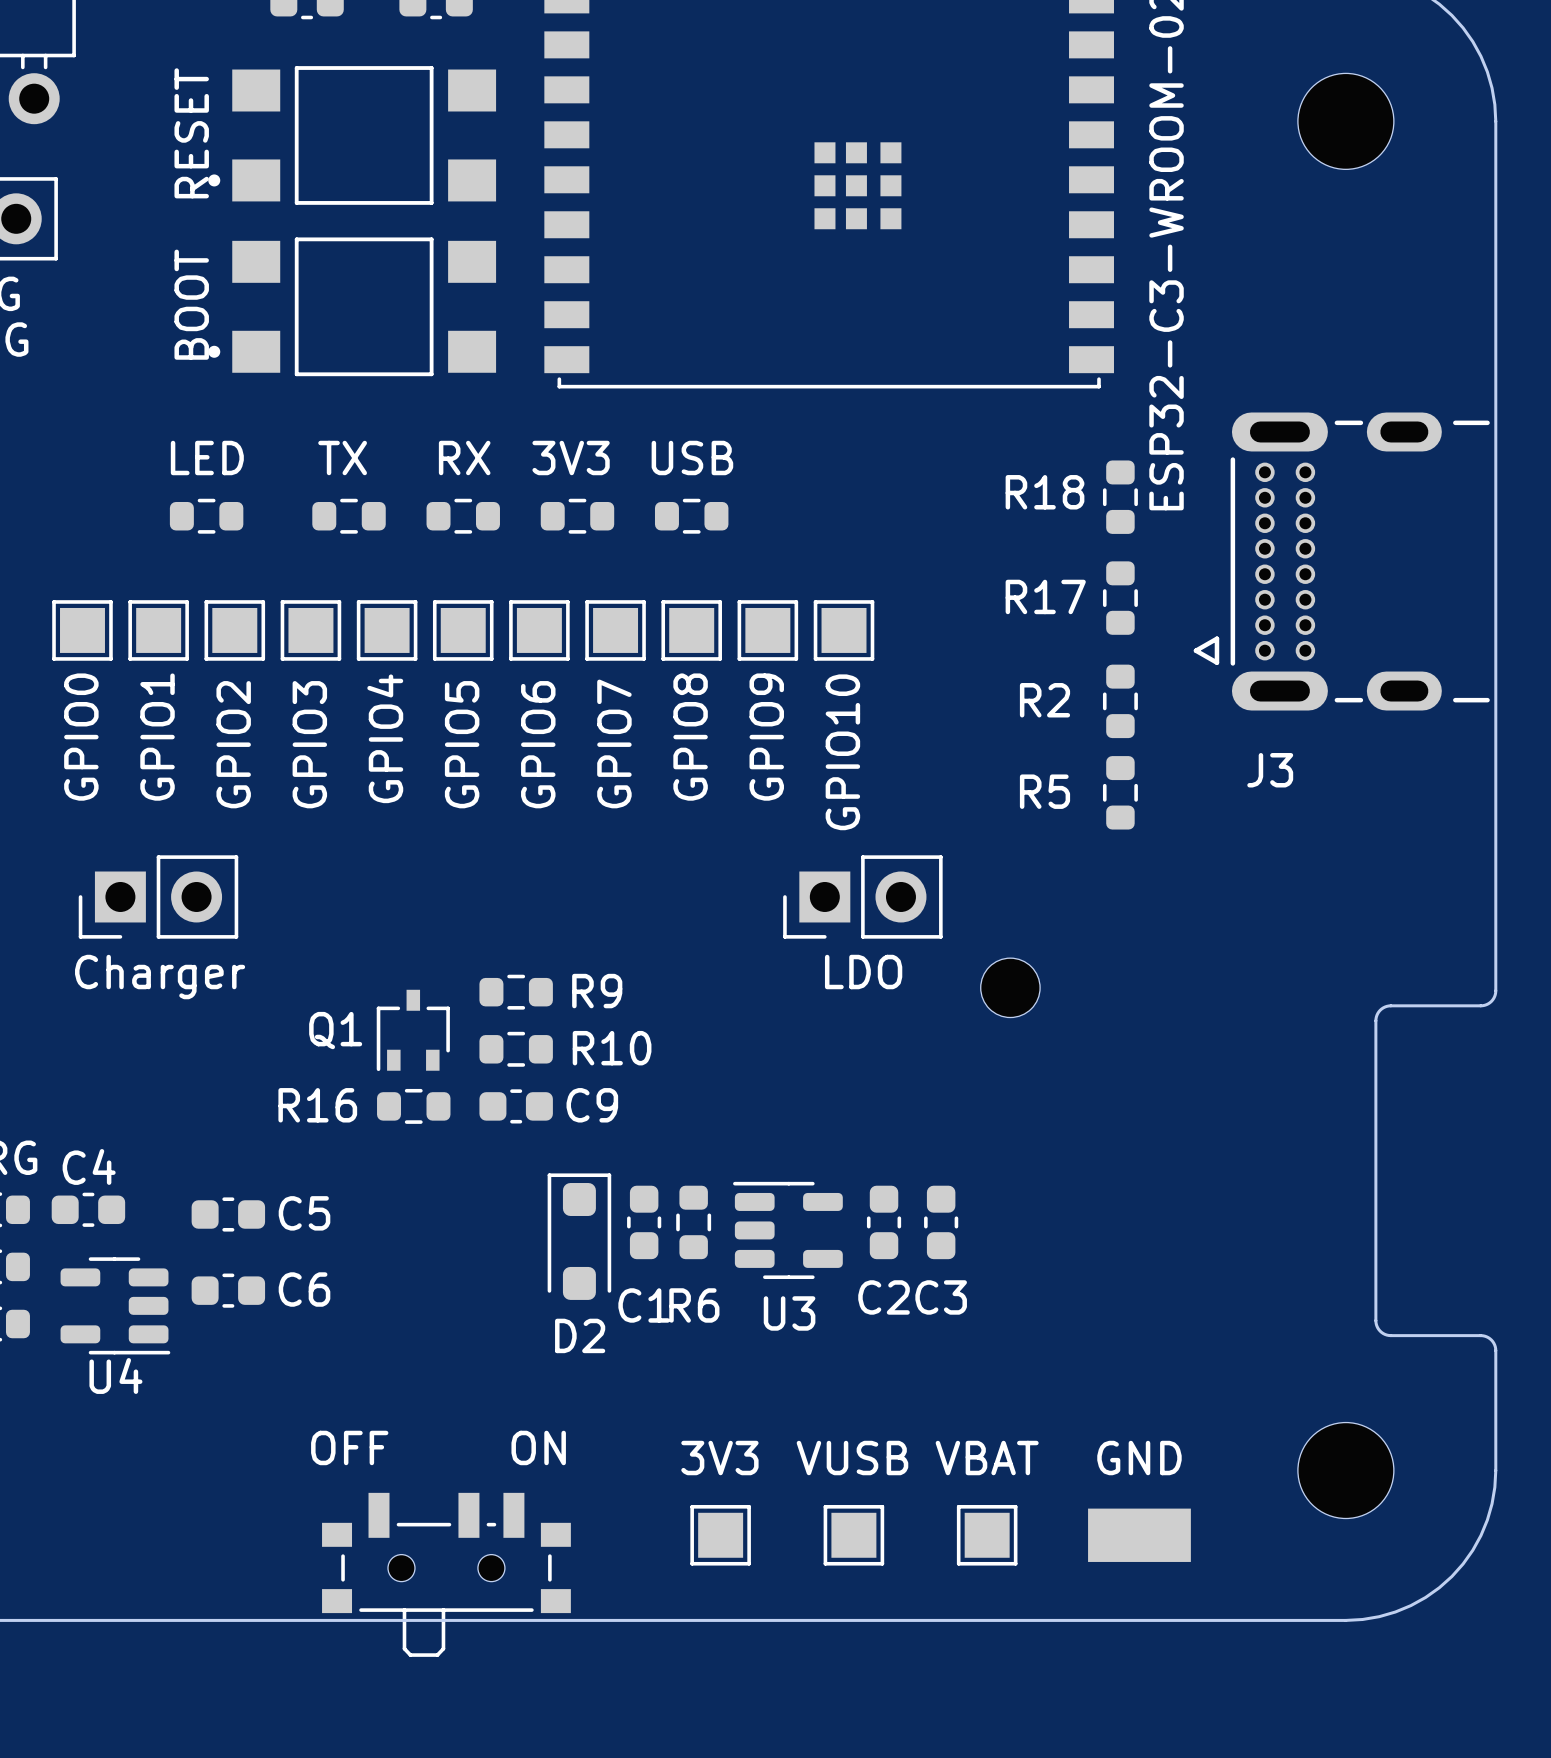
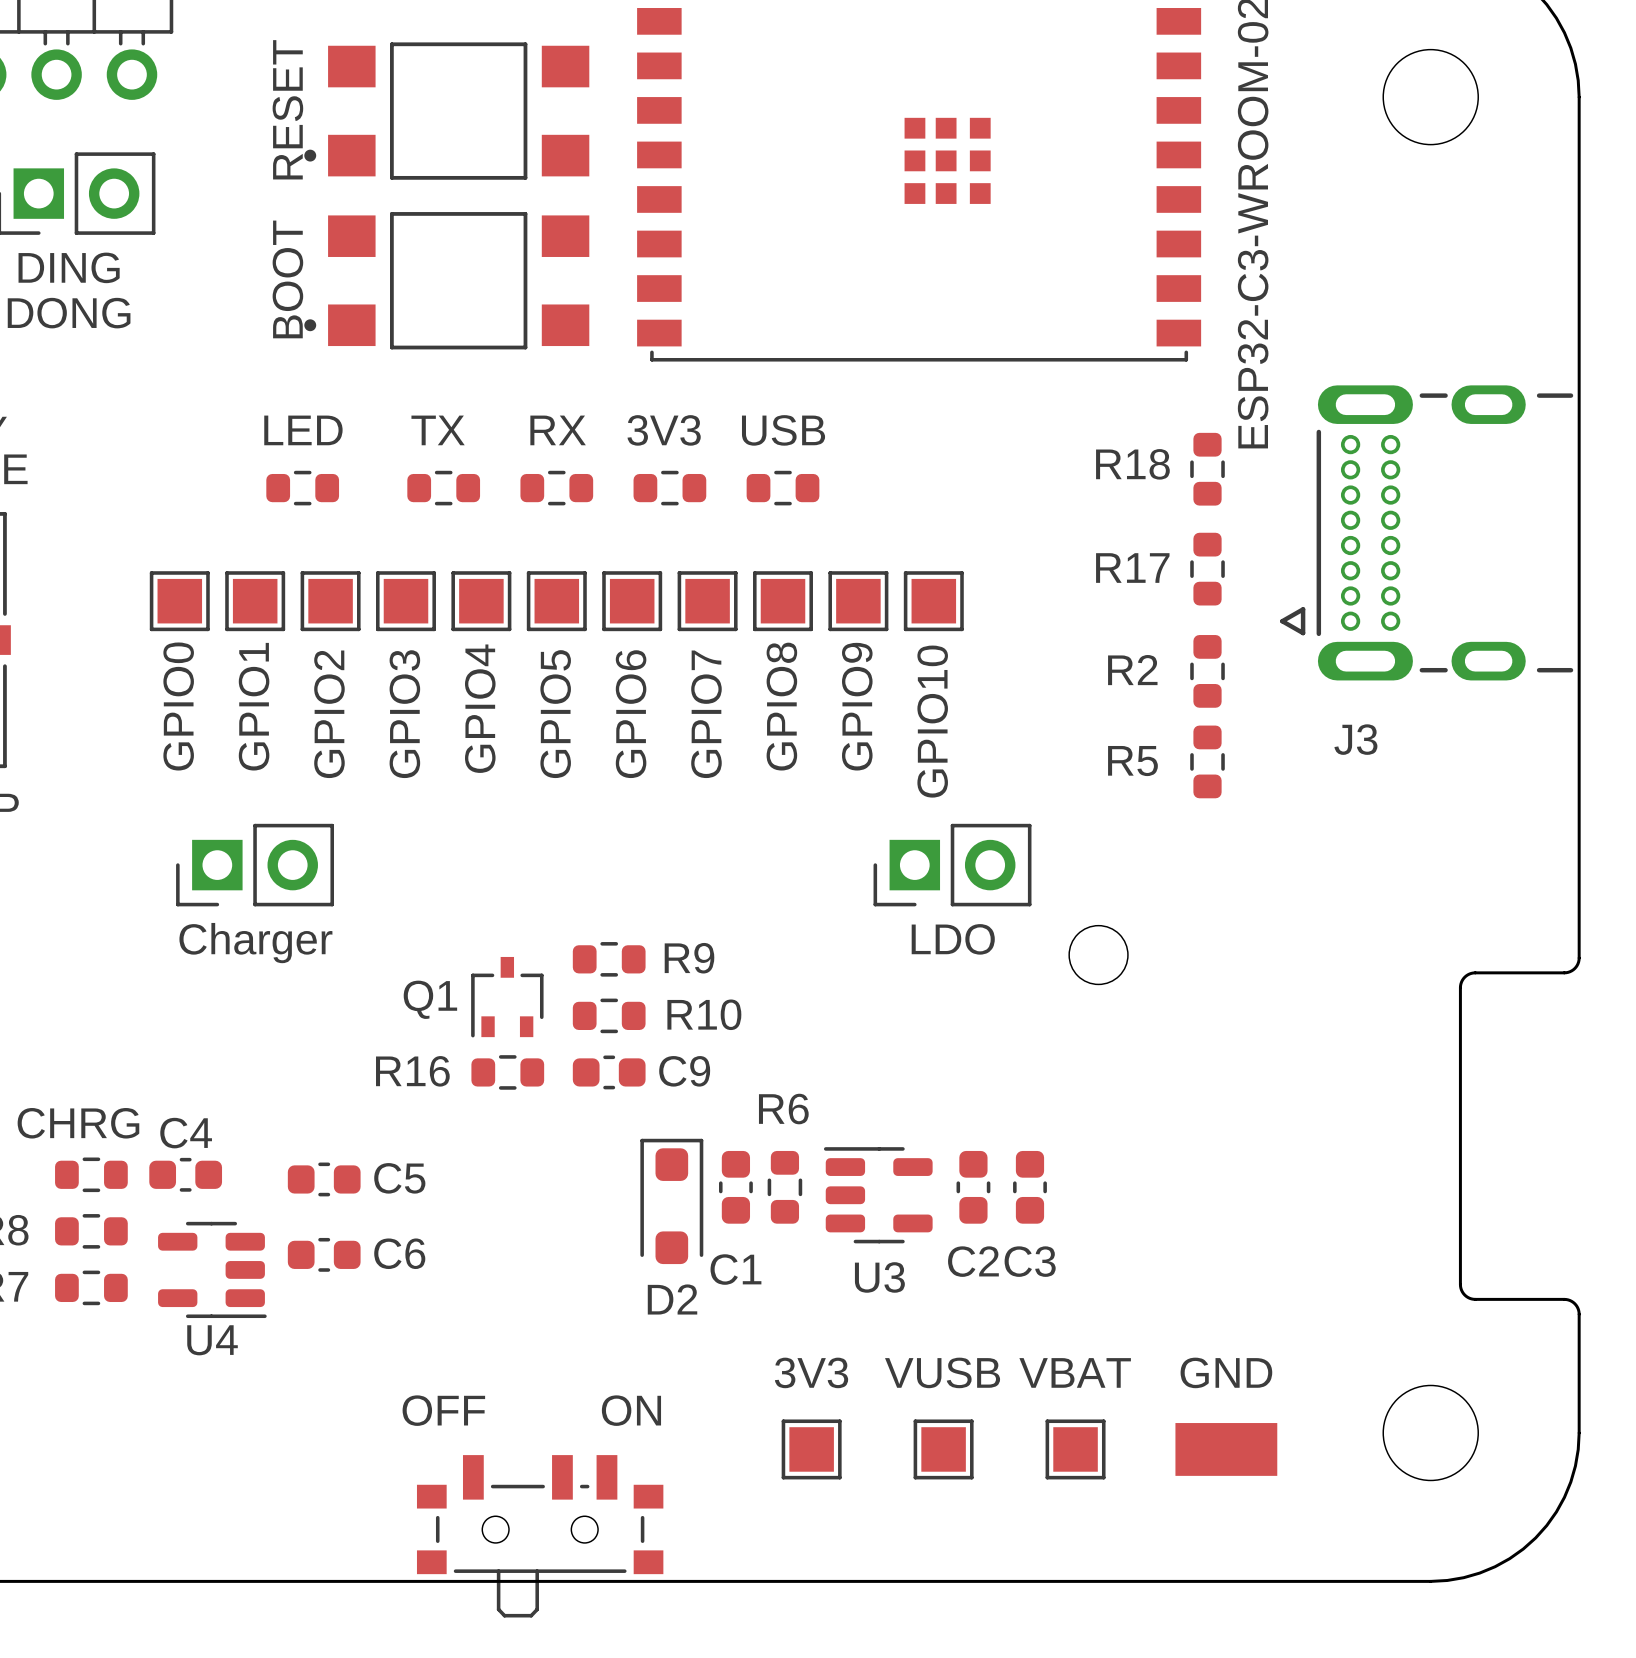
R6 name position: R6 (694, 1305) -> R6 (783, 1109)
part position: (720, 1535) -> (811, 1449)
part position: (853, 1535) -> (943, 1449)
part position: (987, 1535) -> (1075, 1449)
part position: (1139, 1535) -> (1226, 1449)

